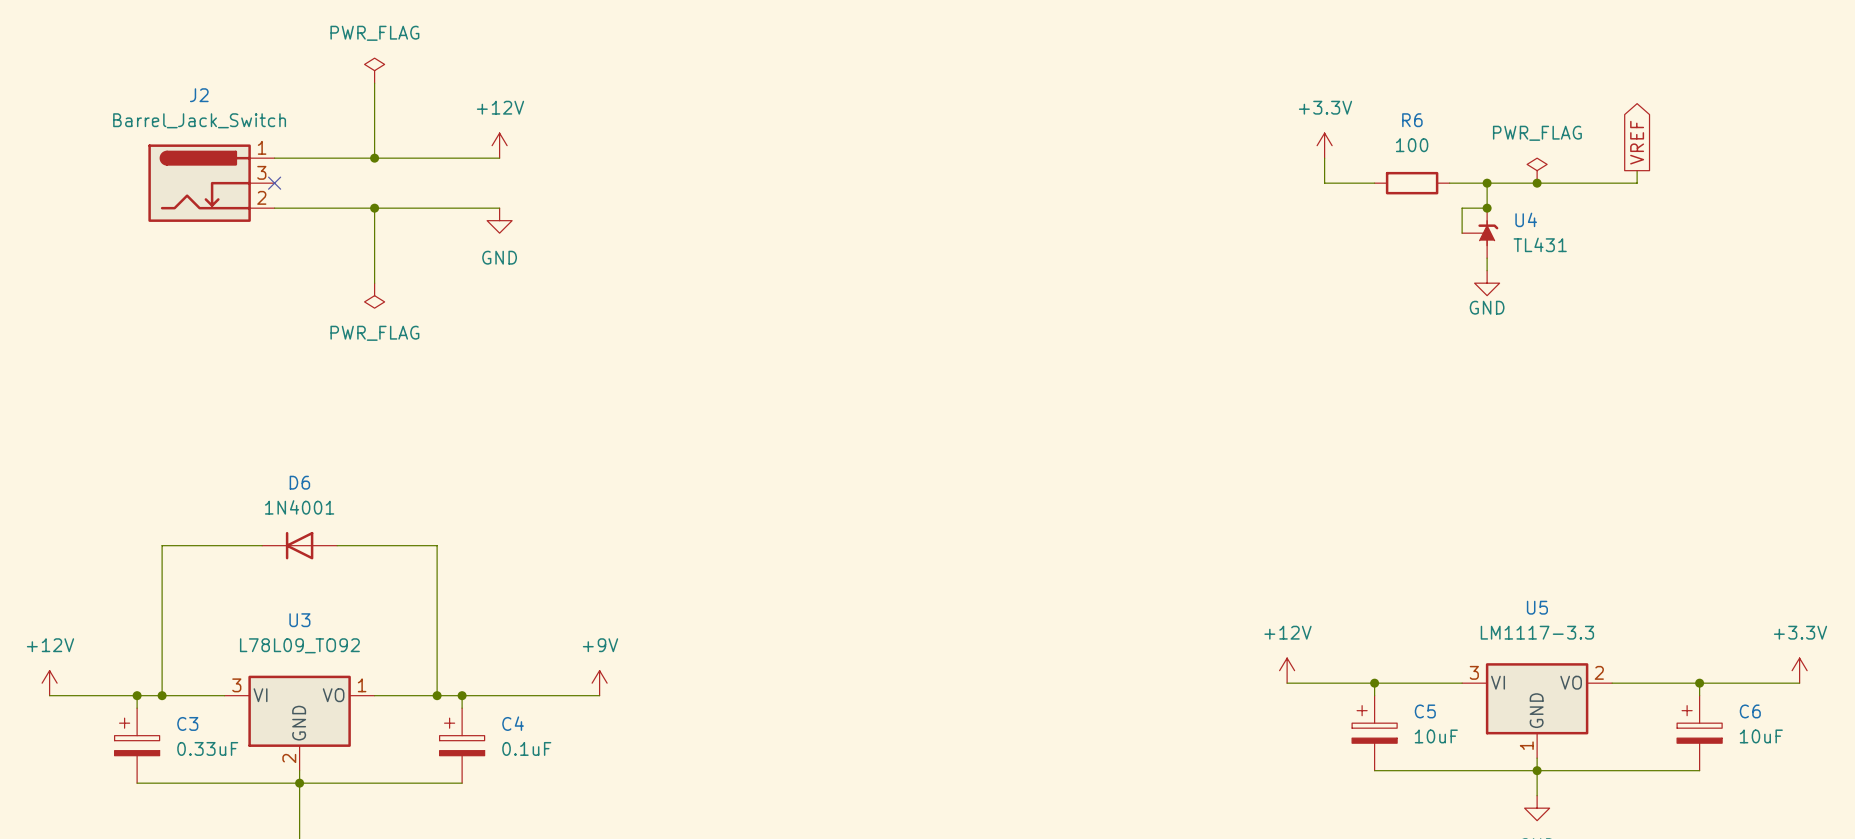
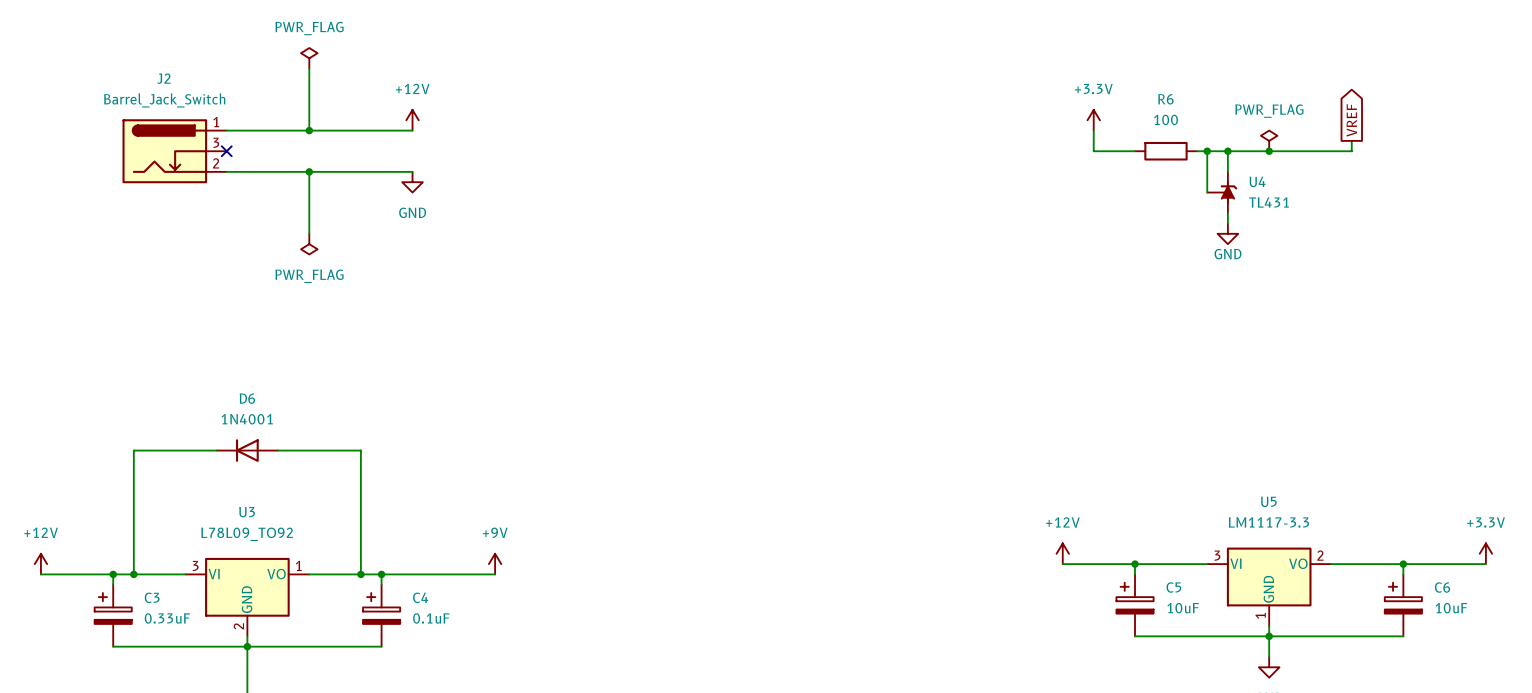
wire: (1462, 208) (1487, 208) -> (1207, 171) (1207, 151)
junction position: (1487, 208) -> (1207, 151)

